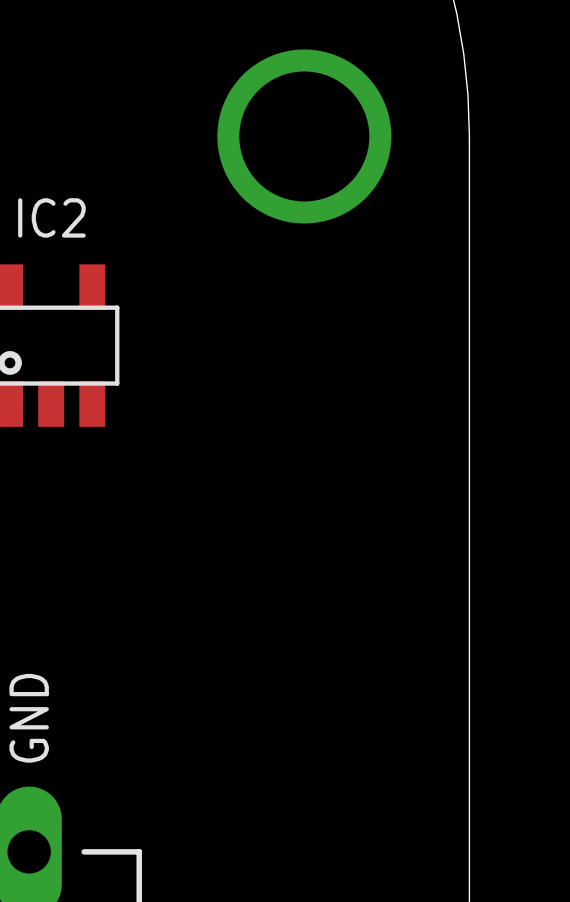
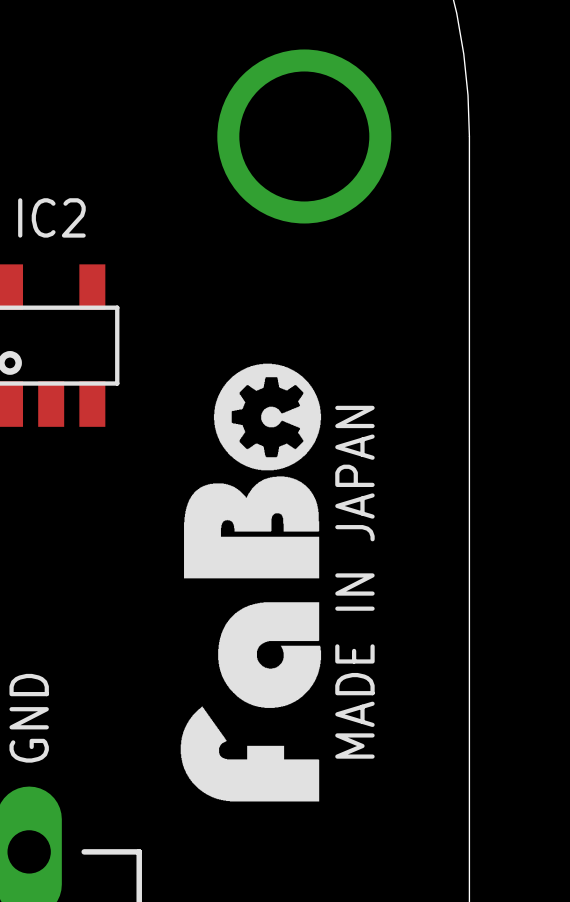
drawing: none -> [180, 363, 322, 802]
text: none -> MADE IN JAPAN (354, 582)

